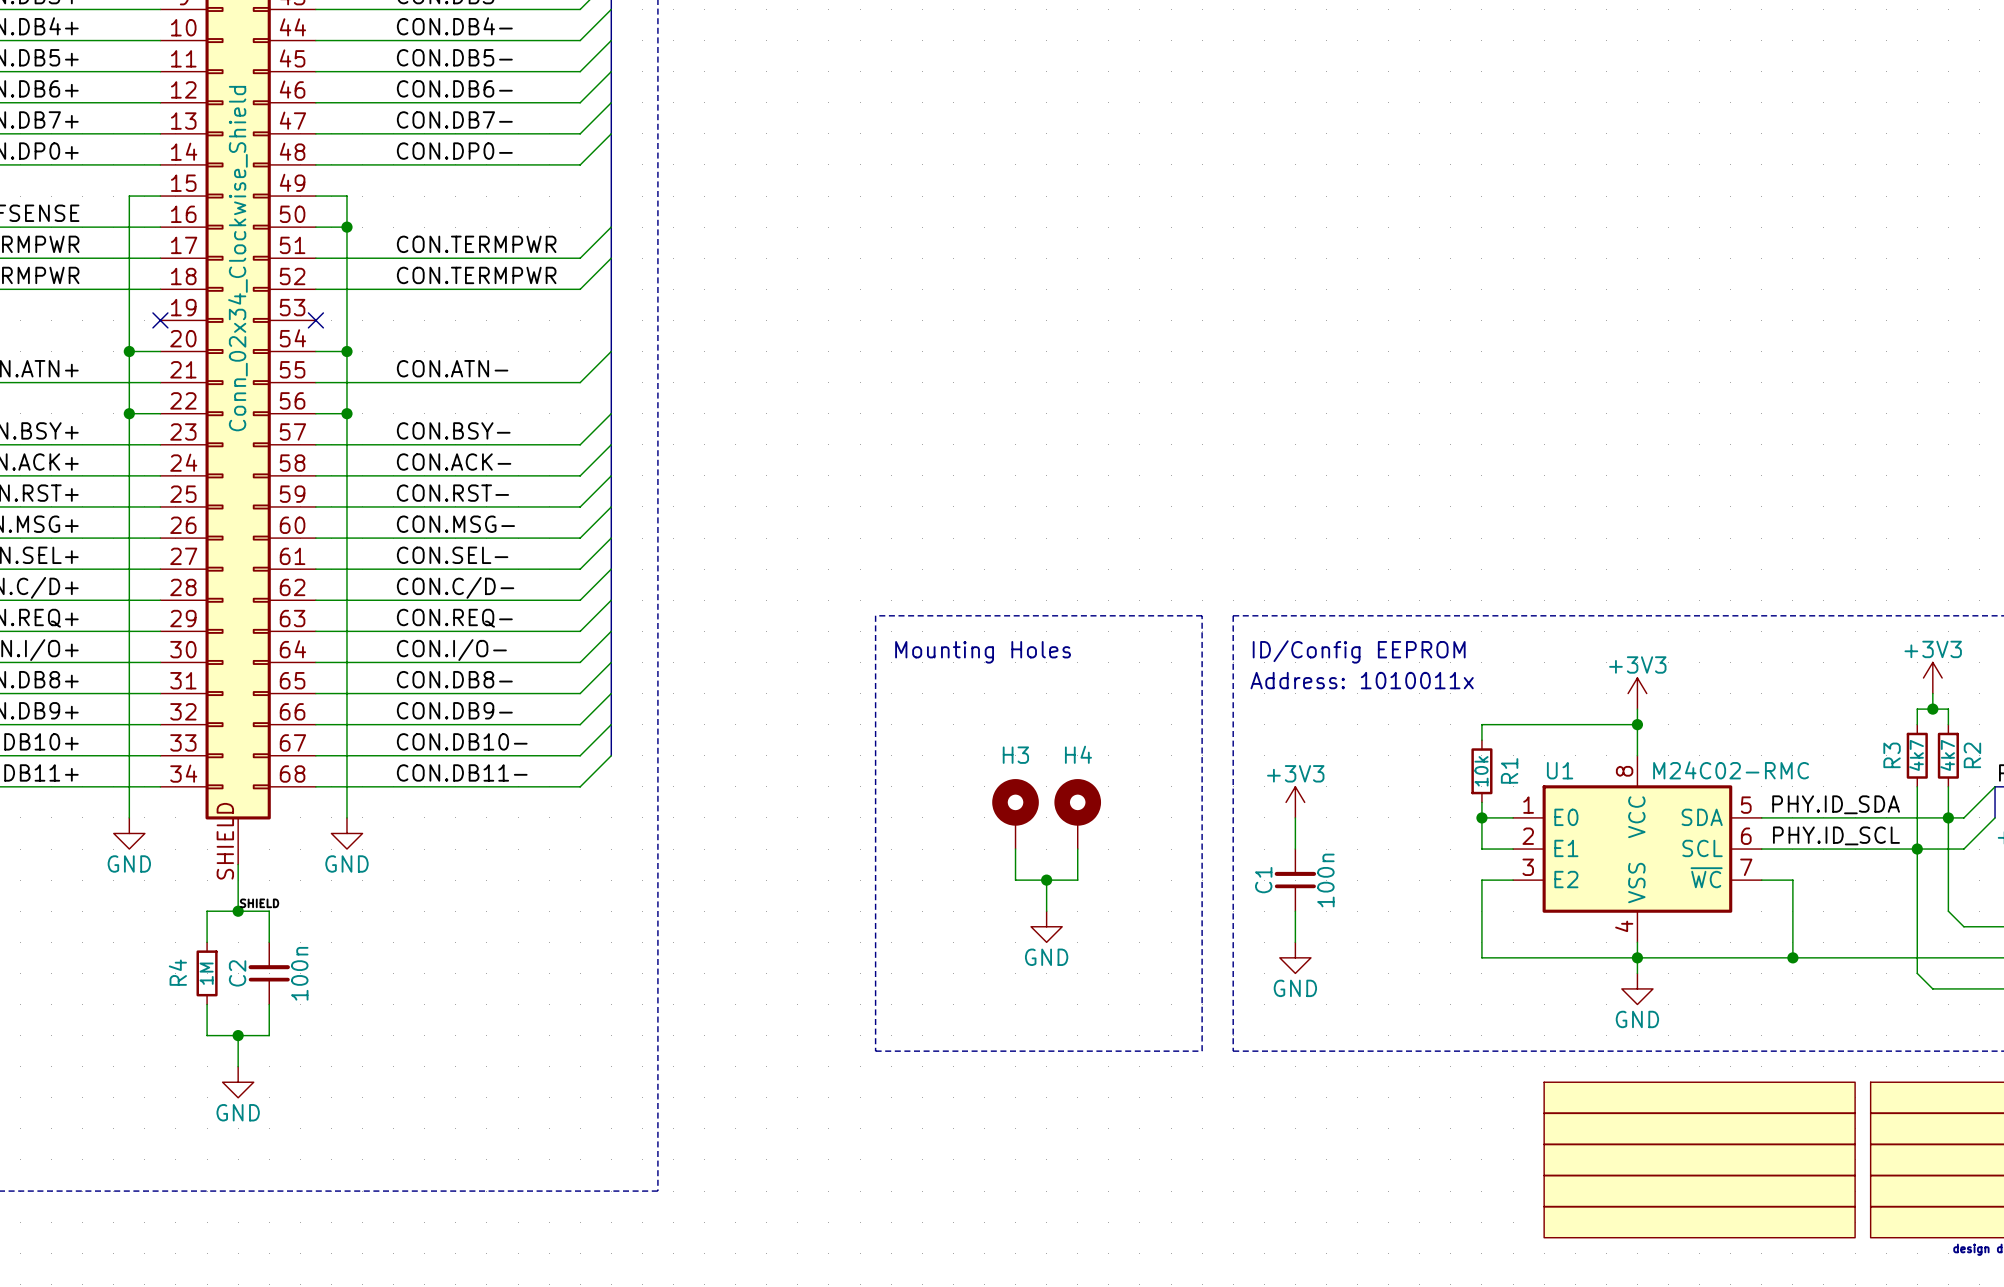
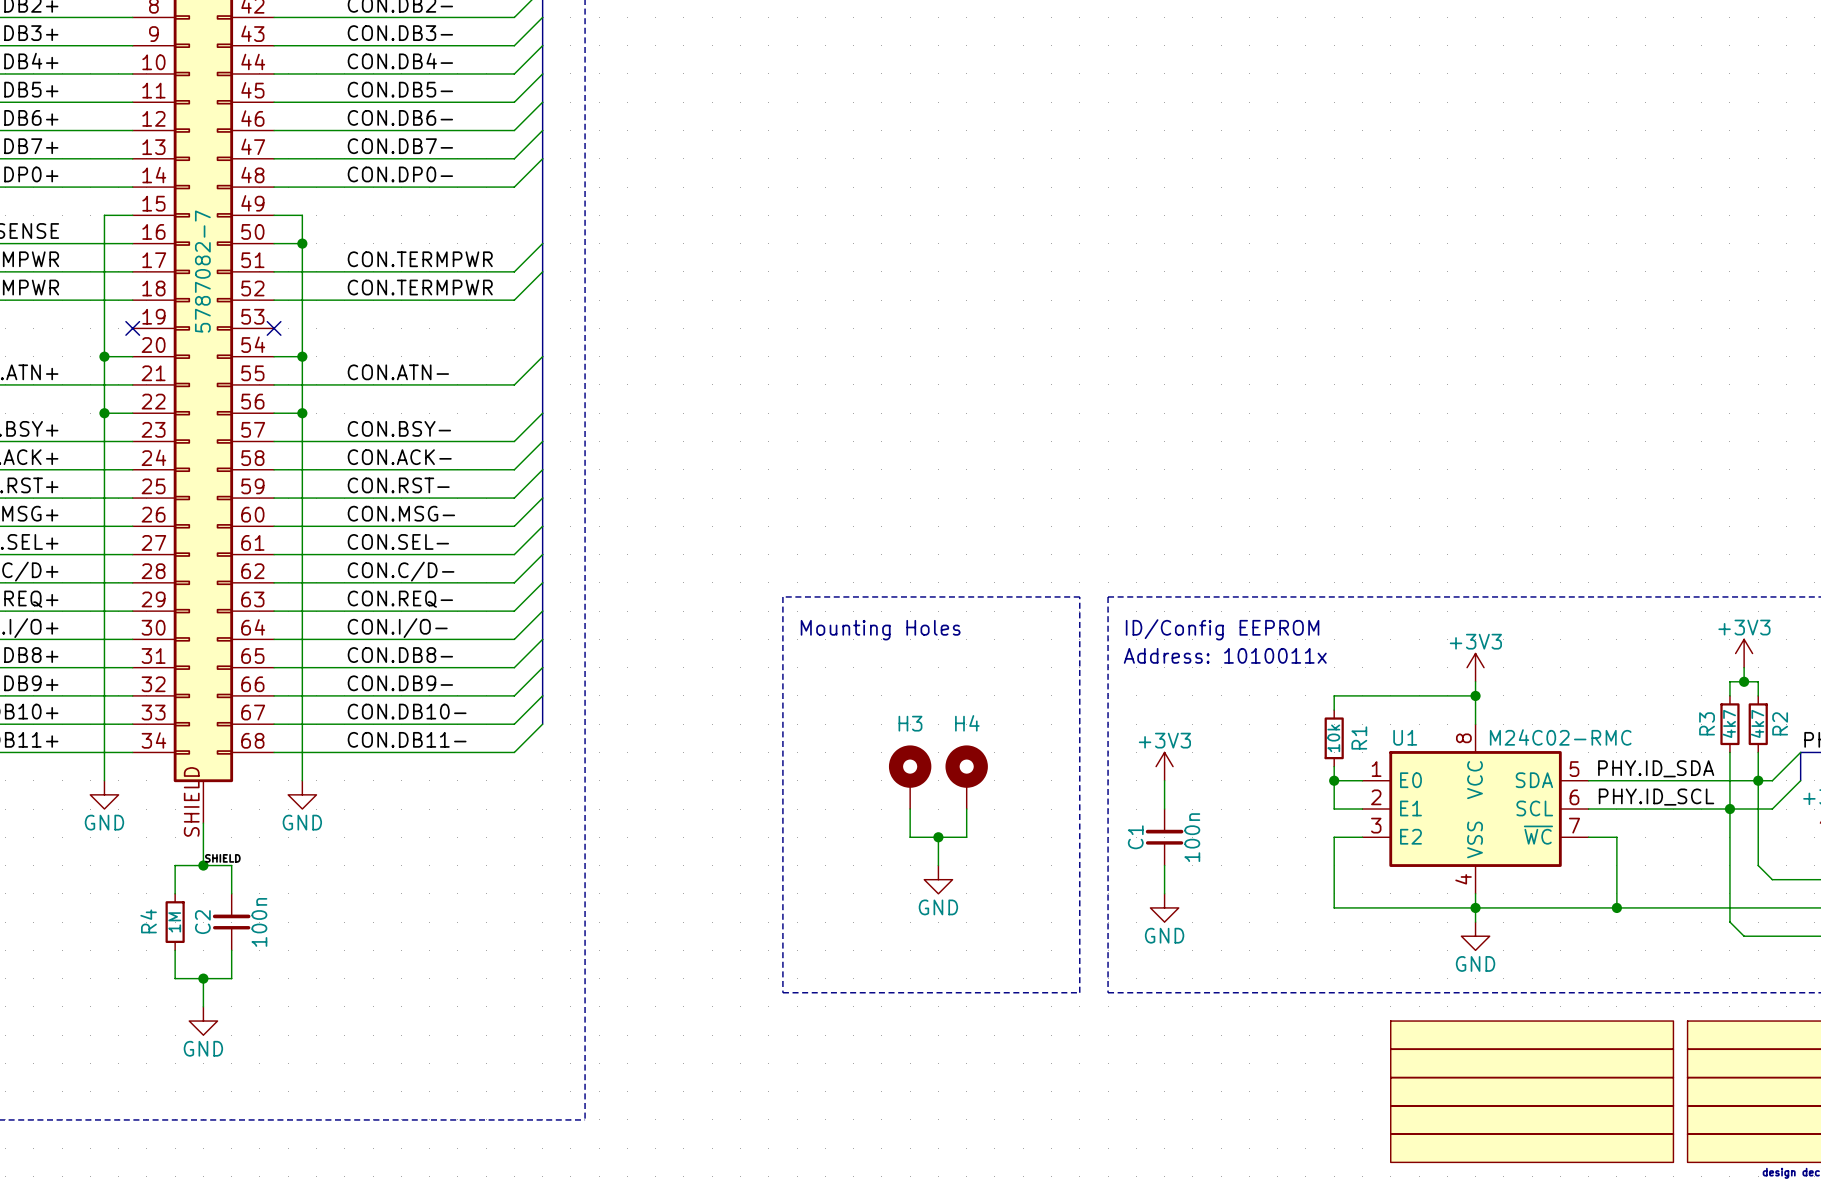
part value: Conn_02x34_Clockwise_Shield (237, 258) -> 5787082-7 (202, 271)

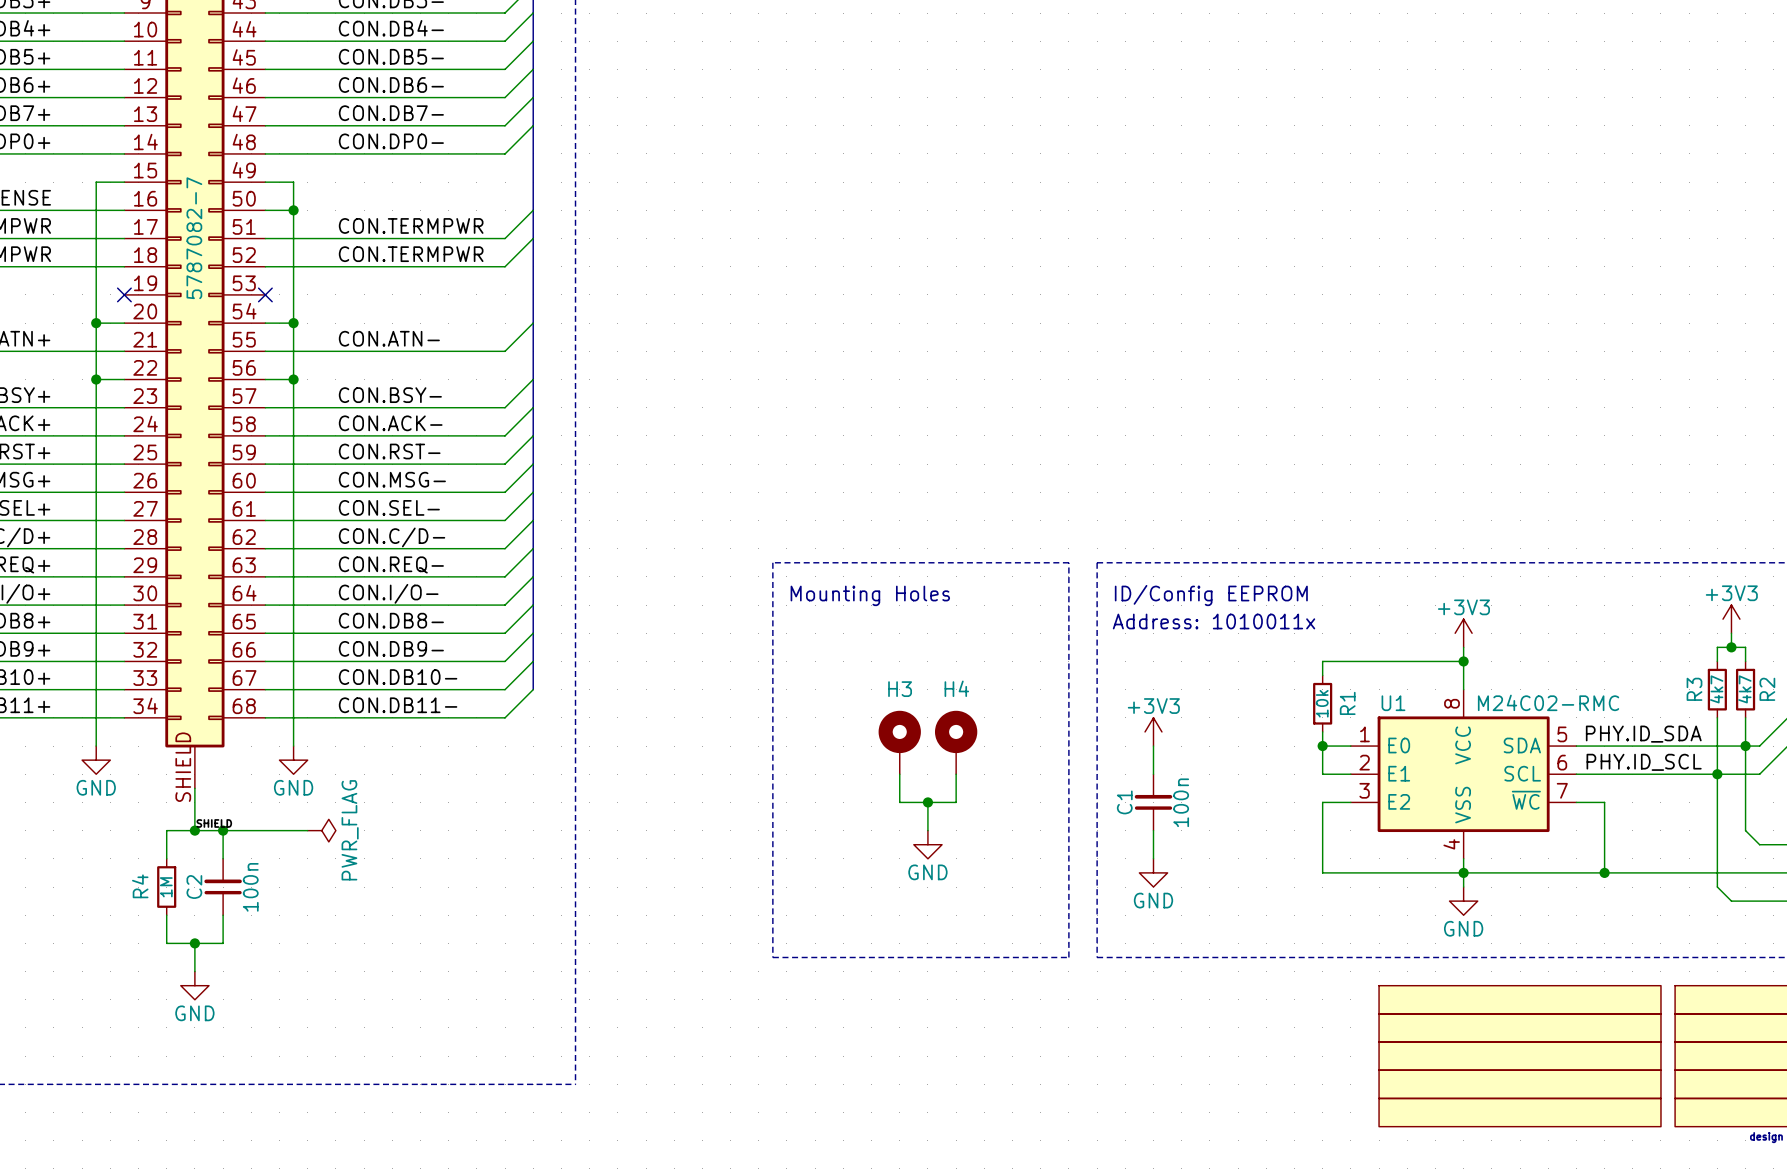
wire: none -> (223, 830) (307, 830)
junction: none -> (223, 830)
power symbol: none -> PWR_FLAG (321, 830)

